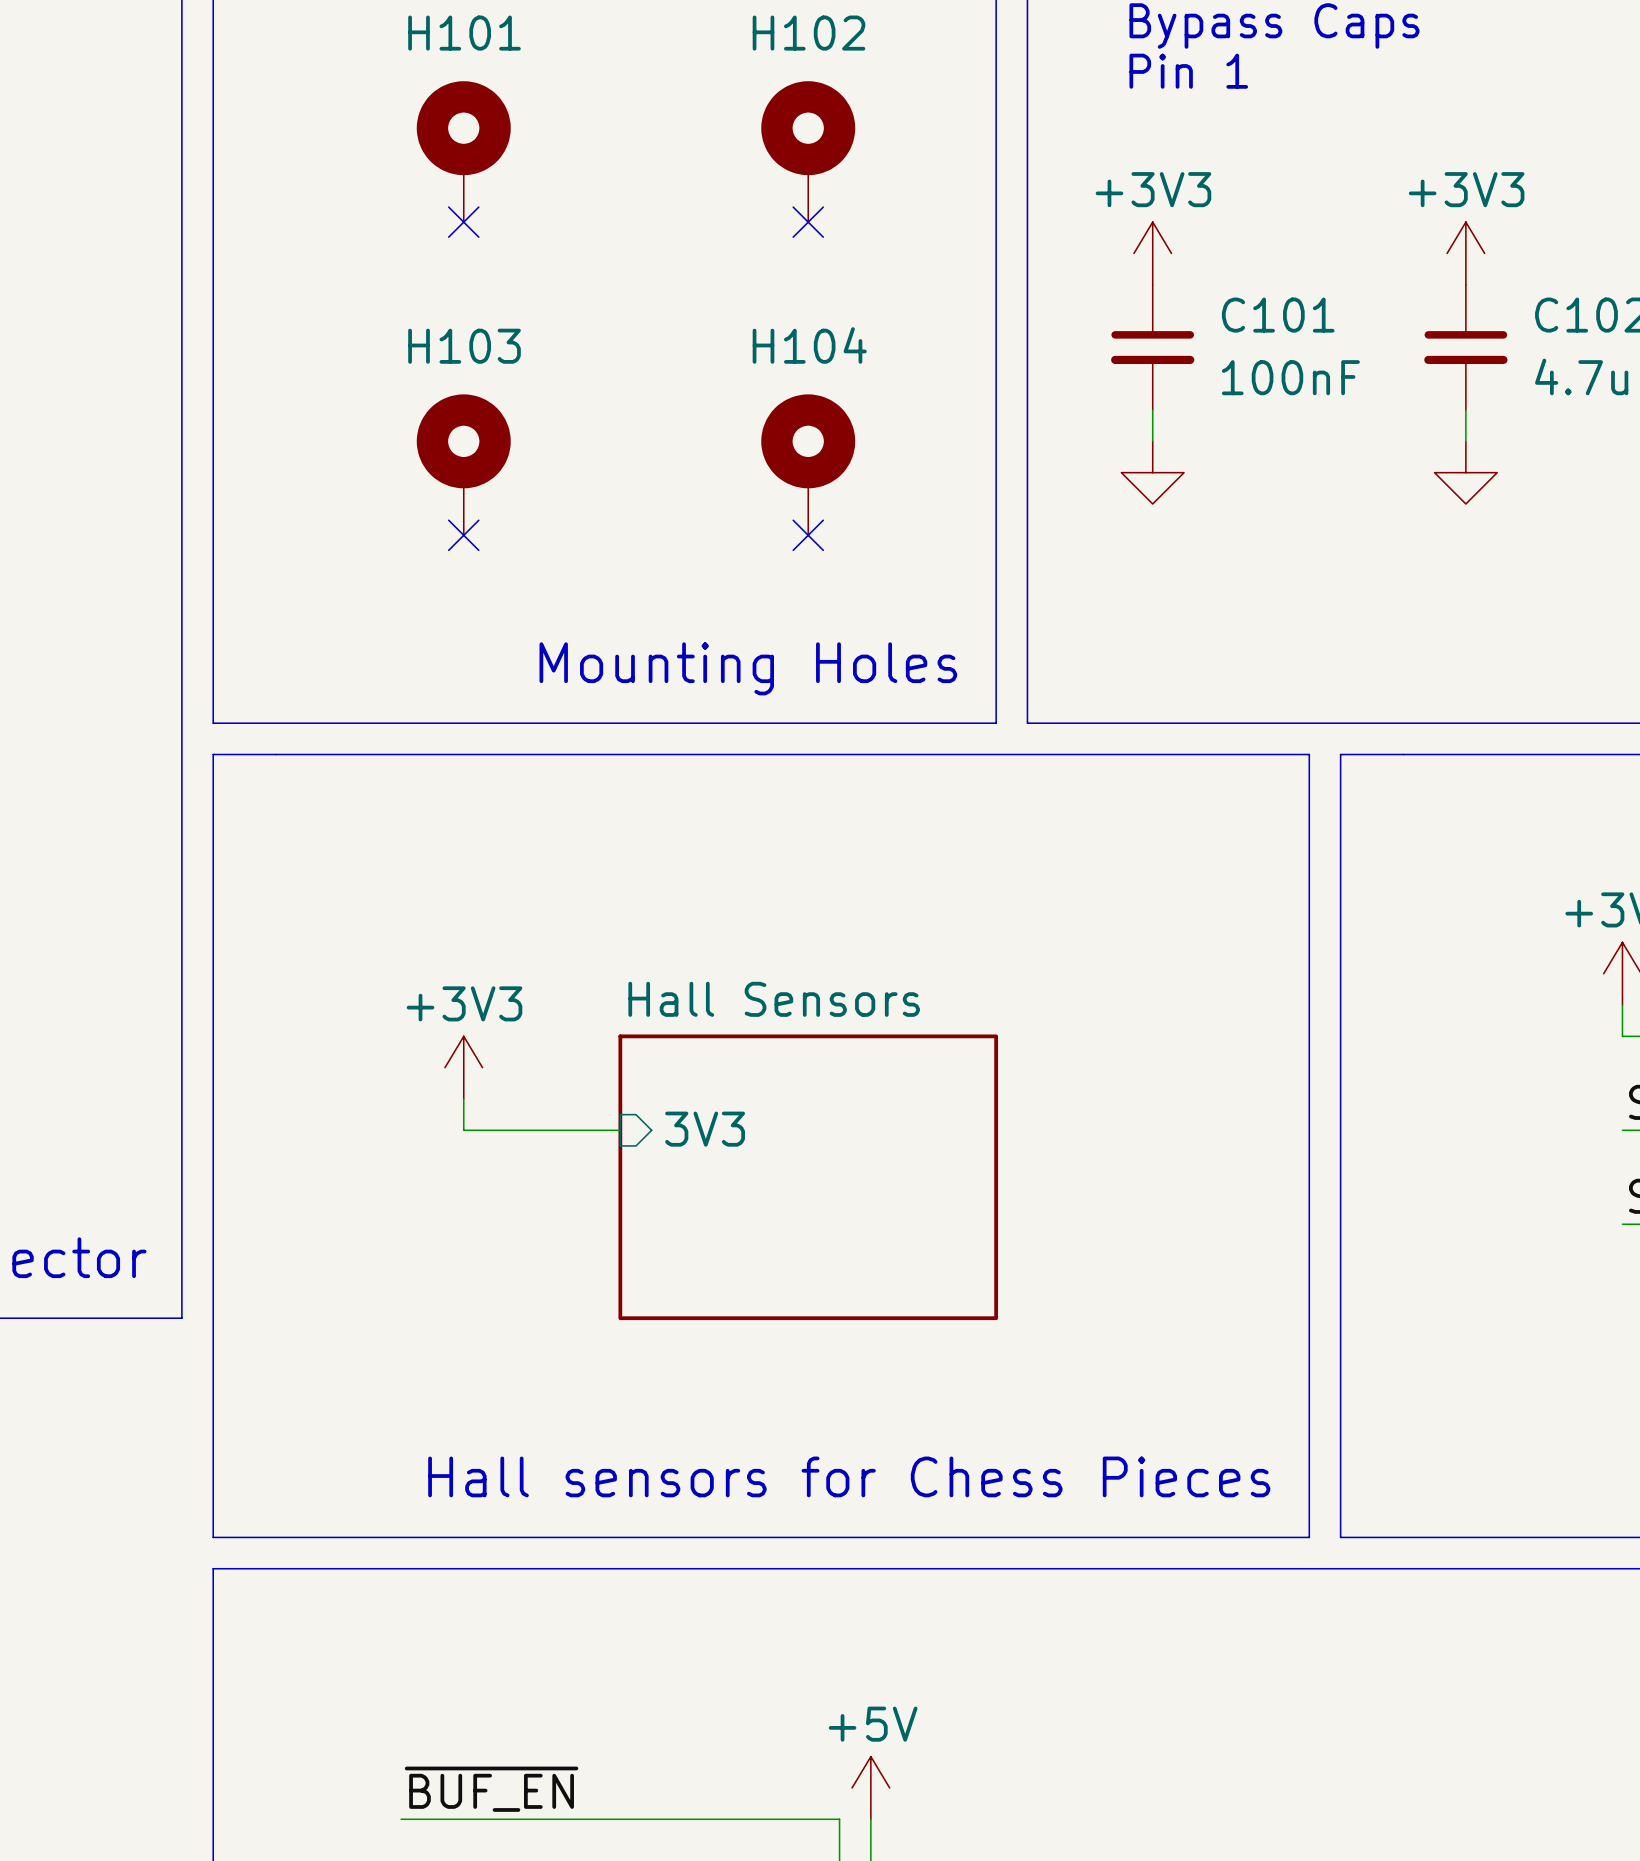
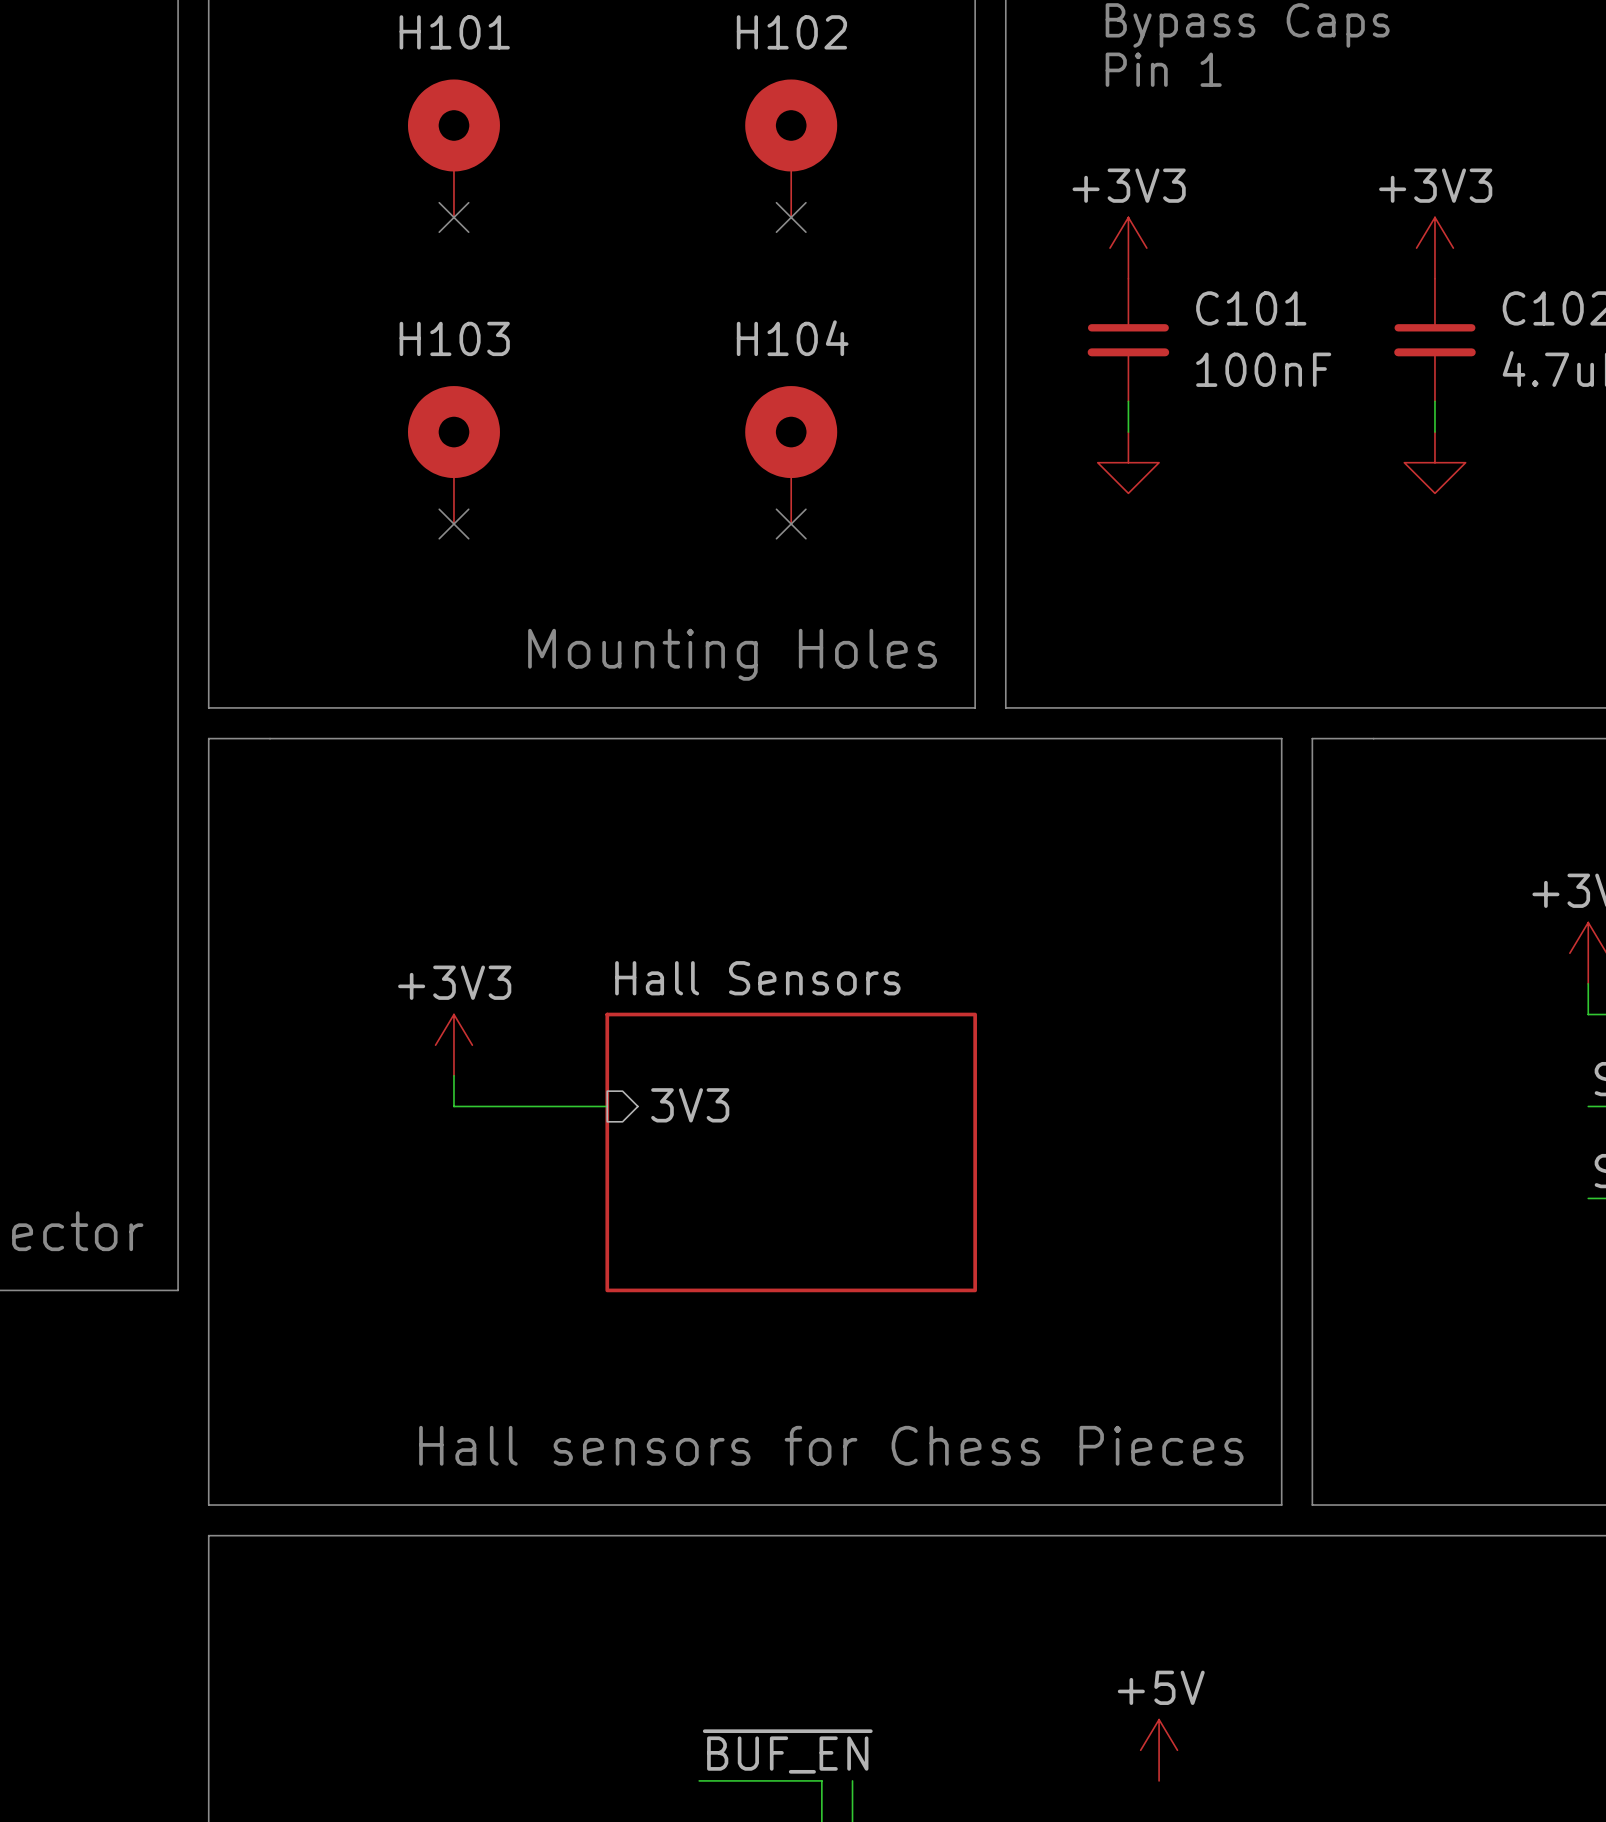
power symbol position: +5V (870, 1787) -> +5V (1159, 1750)
label position: ~{BUF_EN} (491, 1789) -> ~{BUF_EN} (787, 1751)
wire: (401, 1819) (714, 1819) -> none

